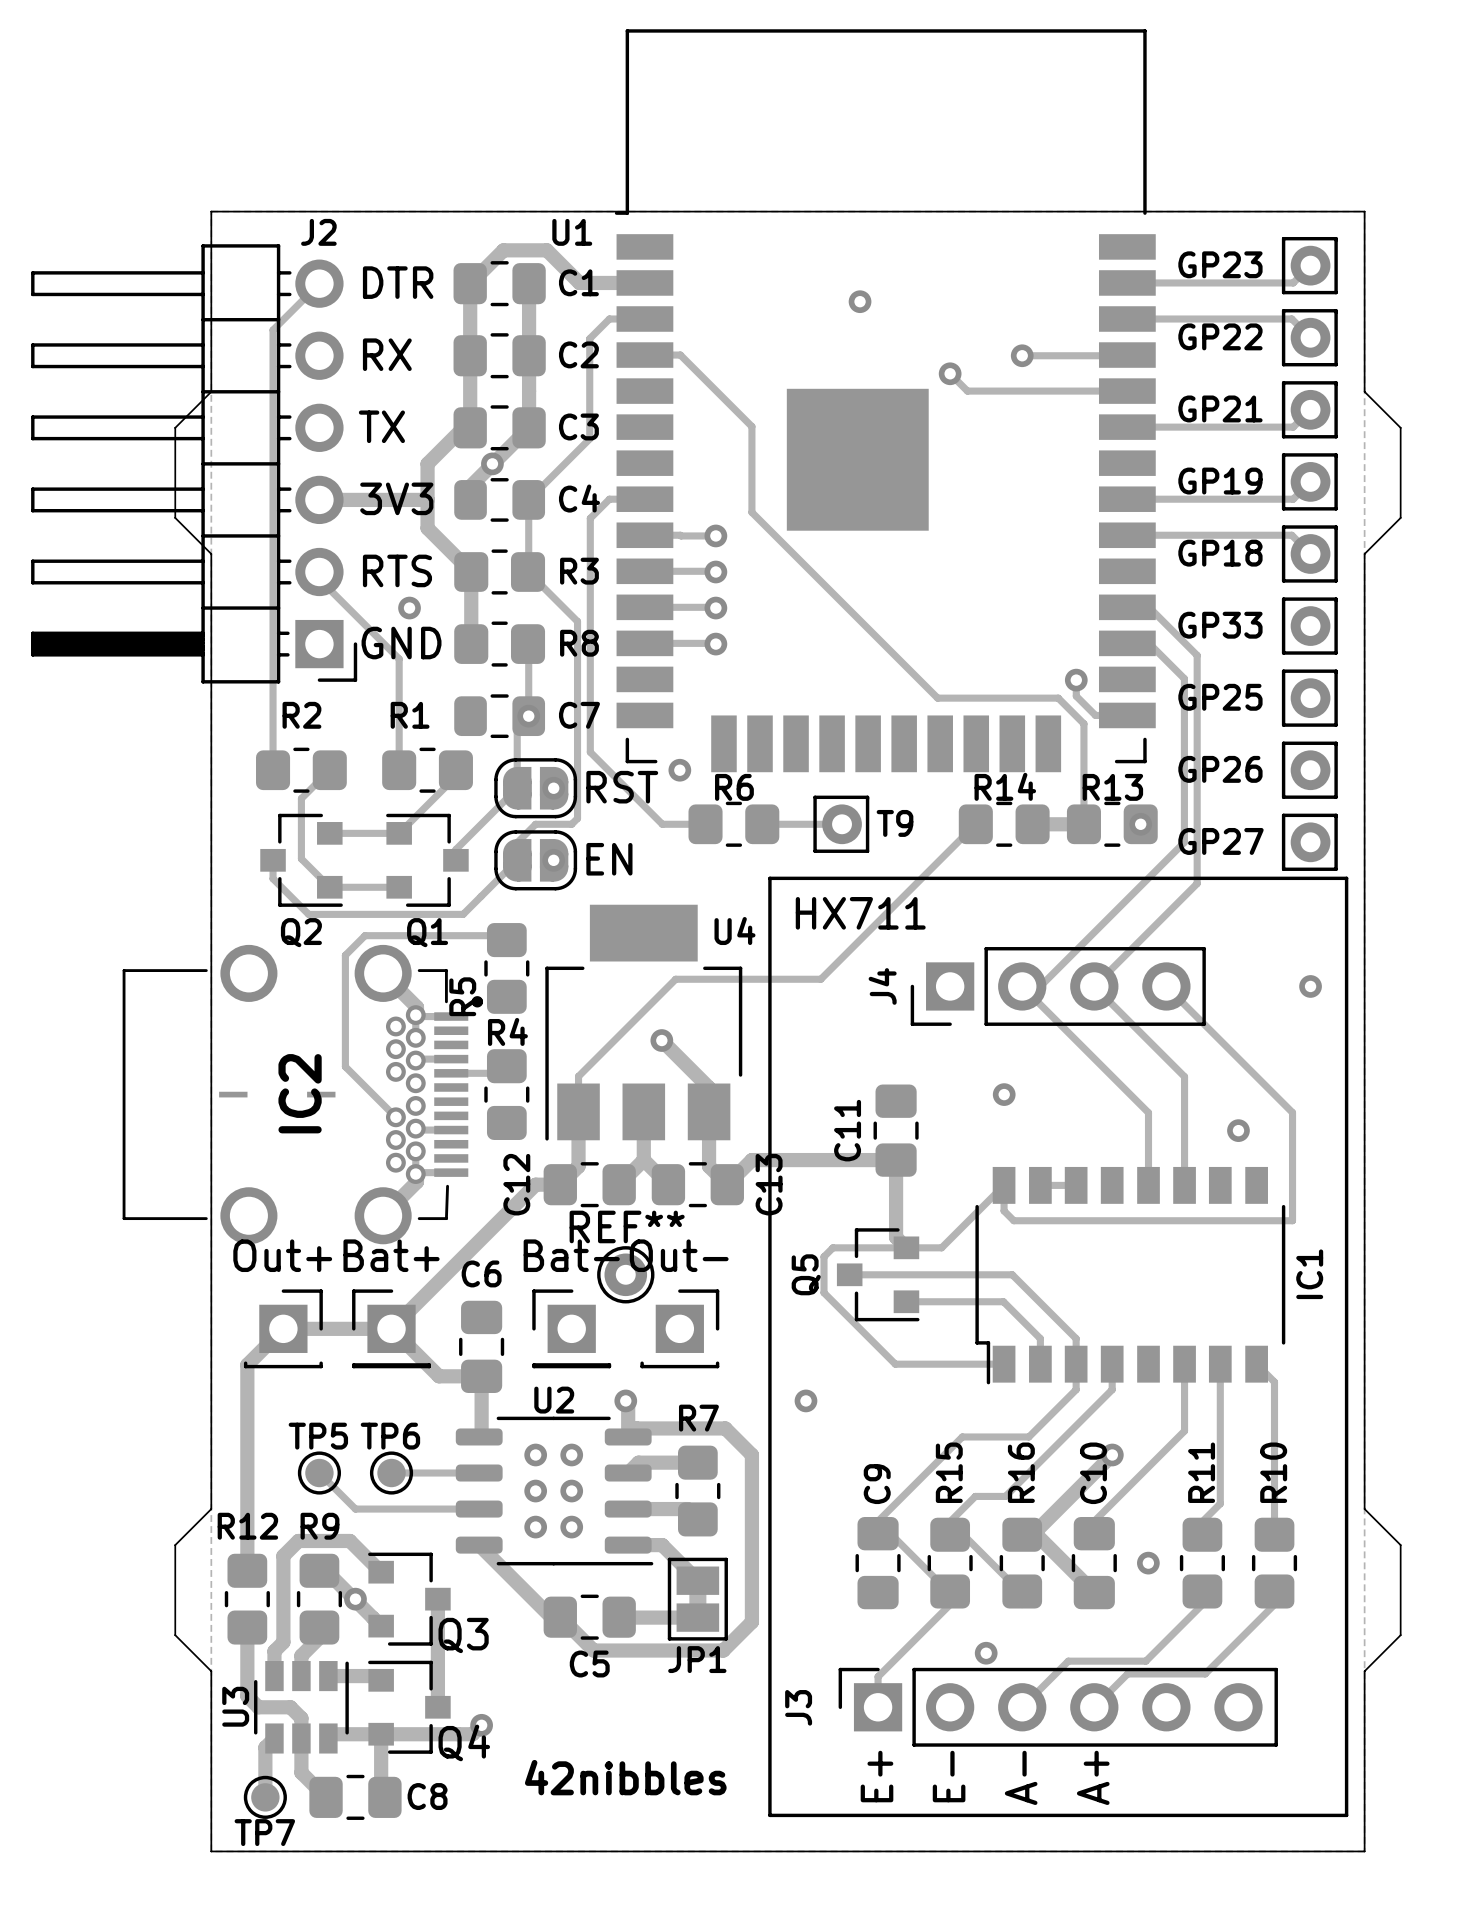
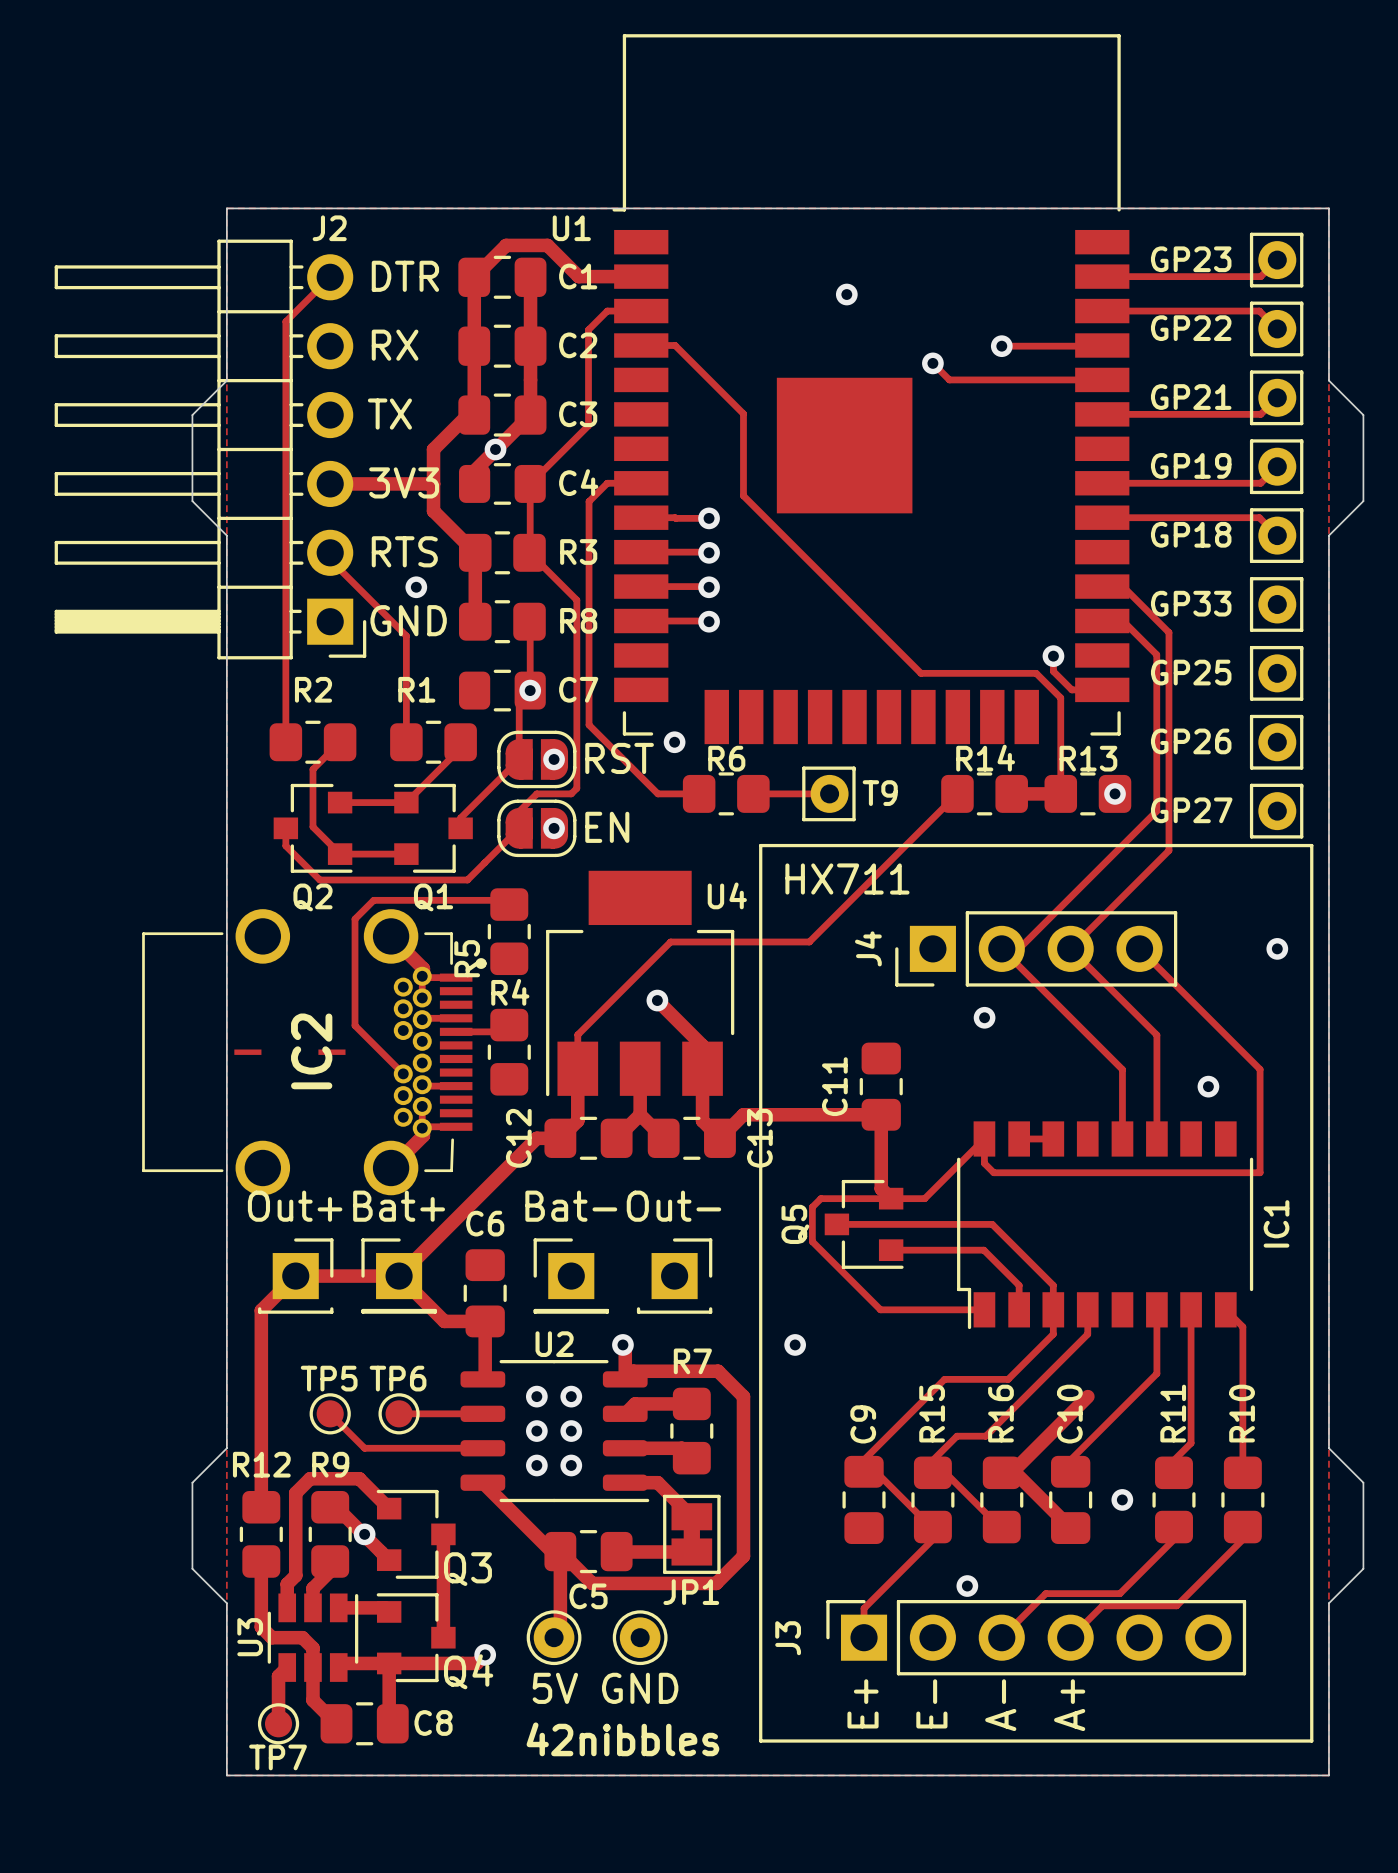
via position: (1004, 1094) -> (984, 1017)
REF**: (625, 1274) -> none
via: (1112, 1454) -> none
track: none -> (554, 1557) (560, 1551) (560, 1631) (554, 1637)
5V: none -> (554, 1637)
GND: none -> (640, 1637)
text position: 42nibbles (625, 1777) -> 42nibbles (622, 1739)

